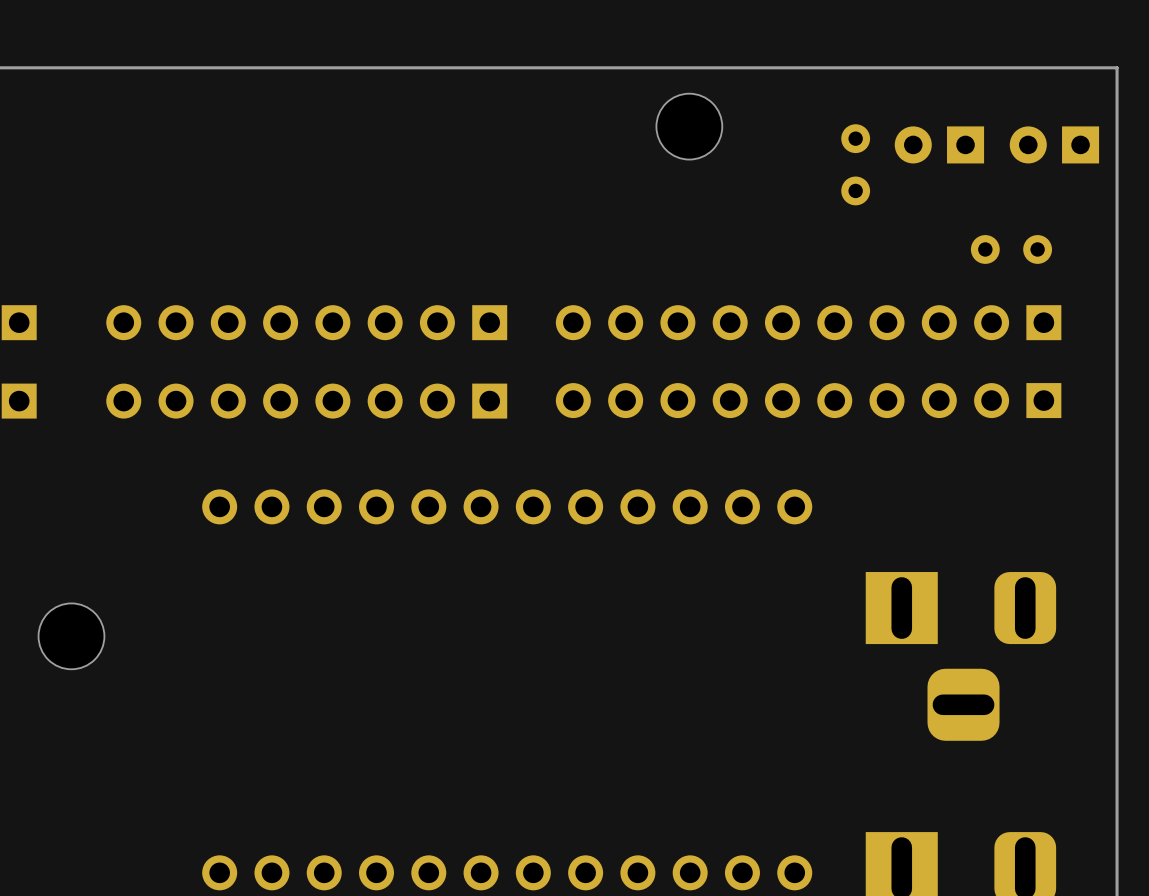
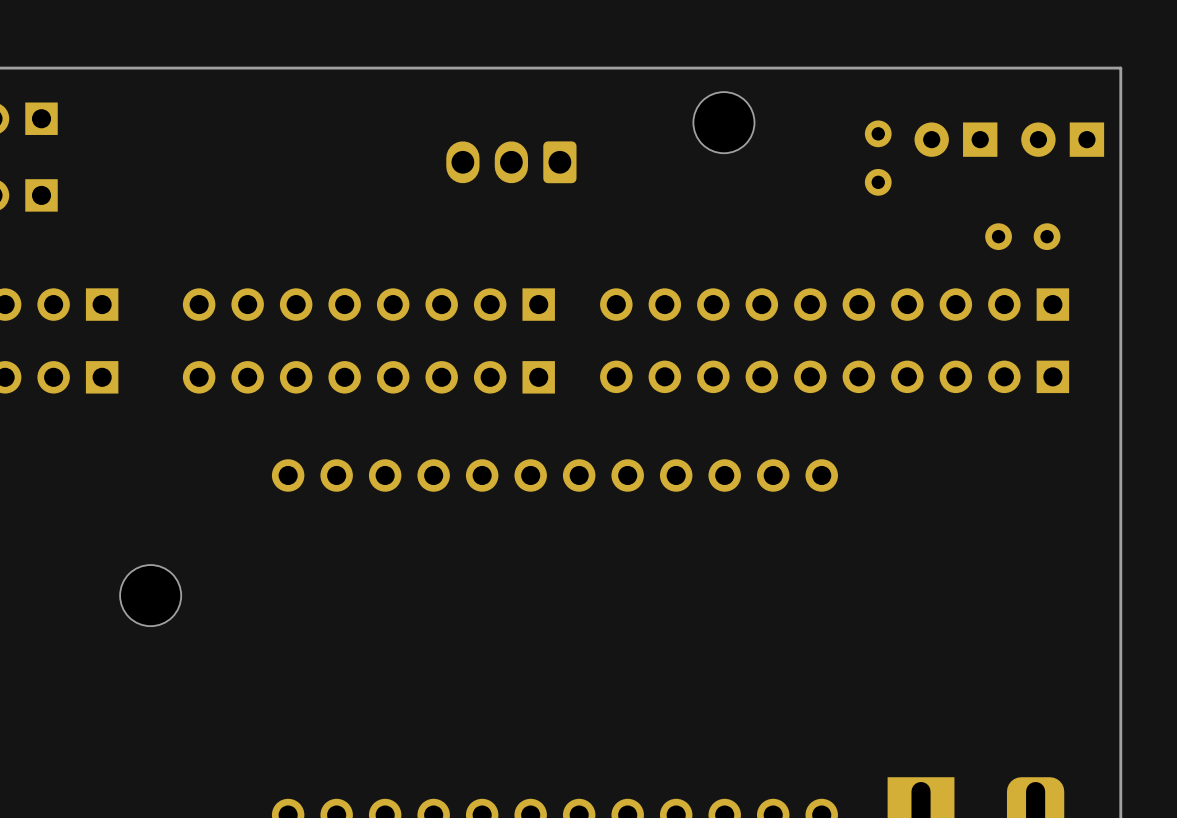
part: none -> (511, 162)
part: (960, 656) -> none

